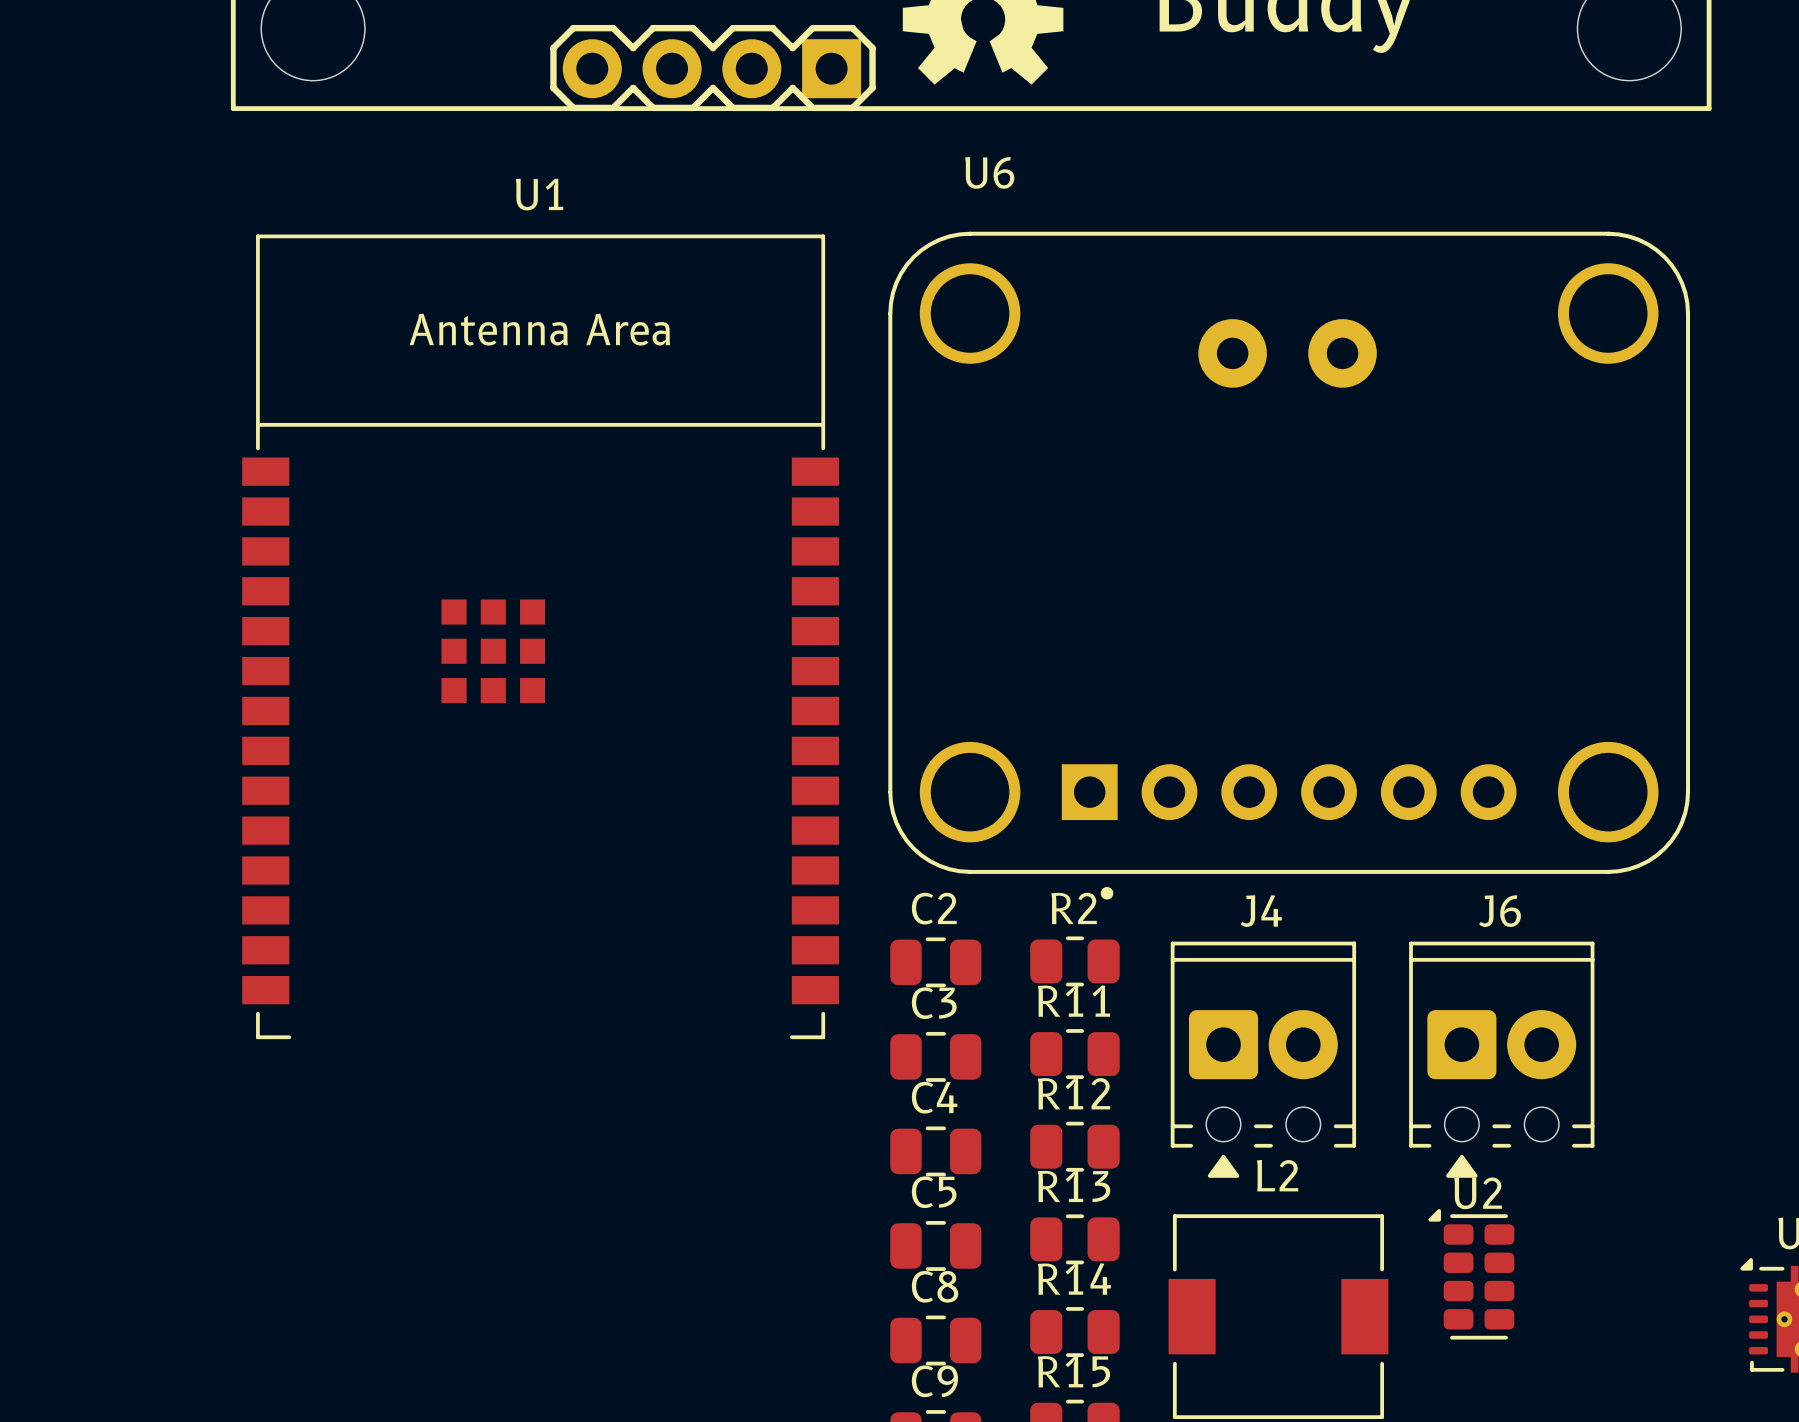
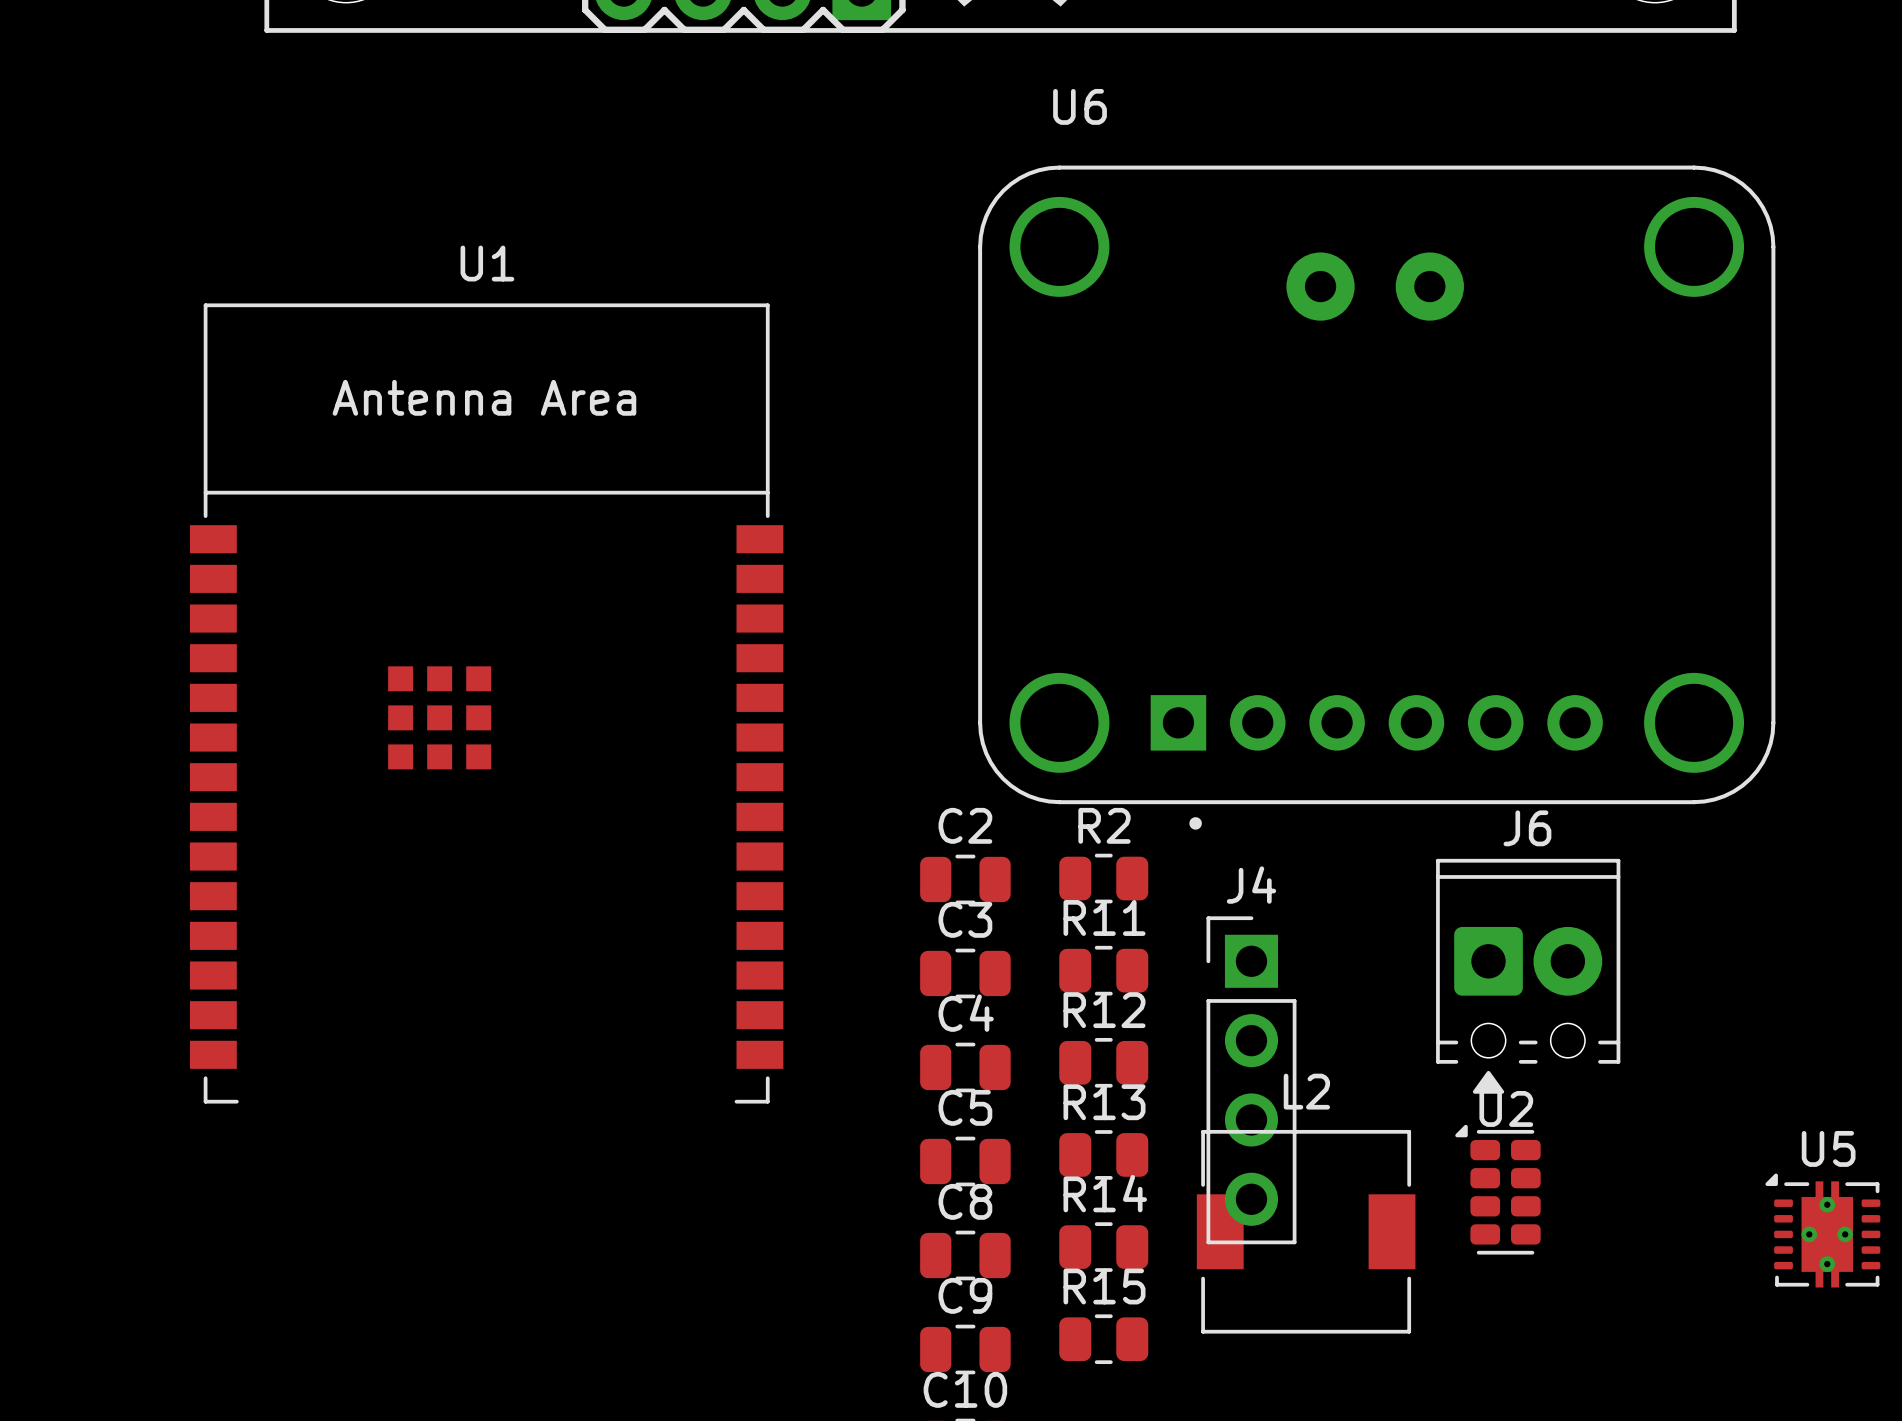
U6 position: (1289, 565) -> (1376, 497)
U1 position: (540, 636) -> (486, 703)
J4 footprint: [1170, 941, 1357, 1178] -> [1206, 916, 1297, 1245]

